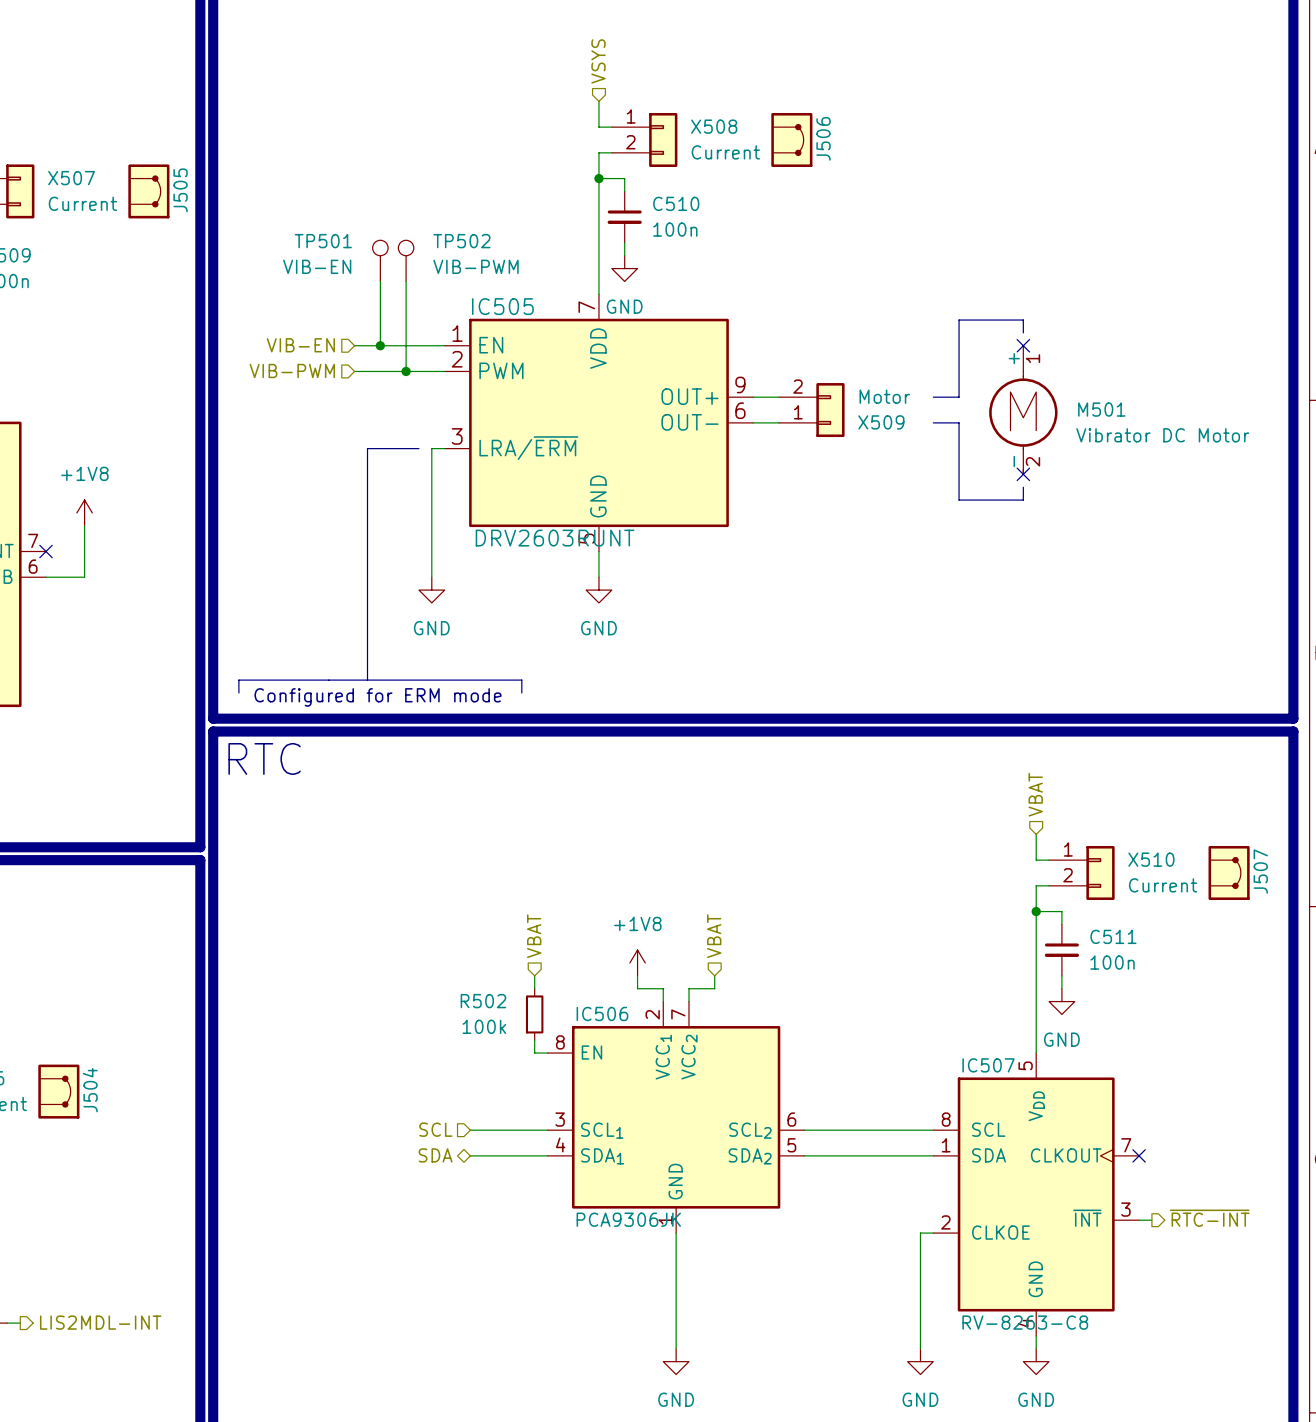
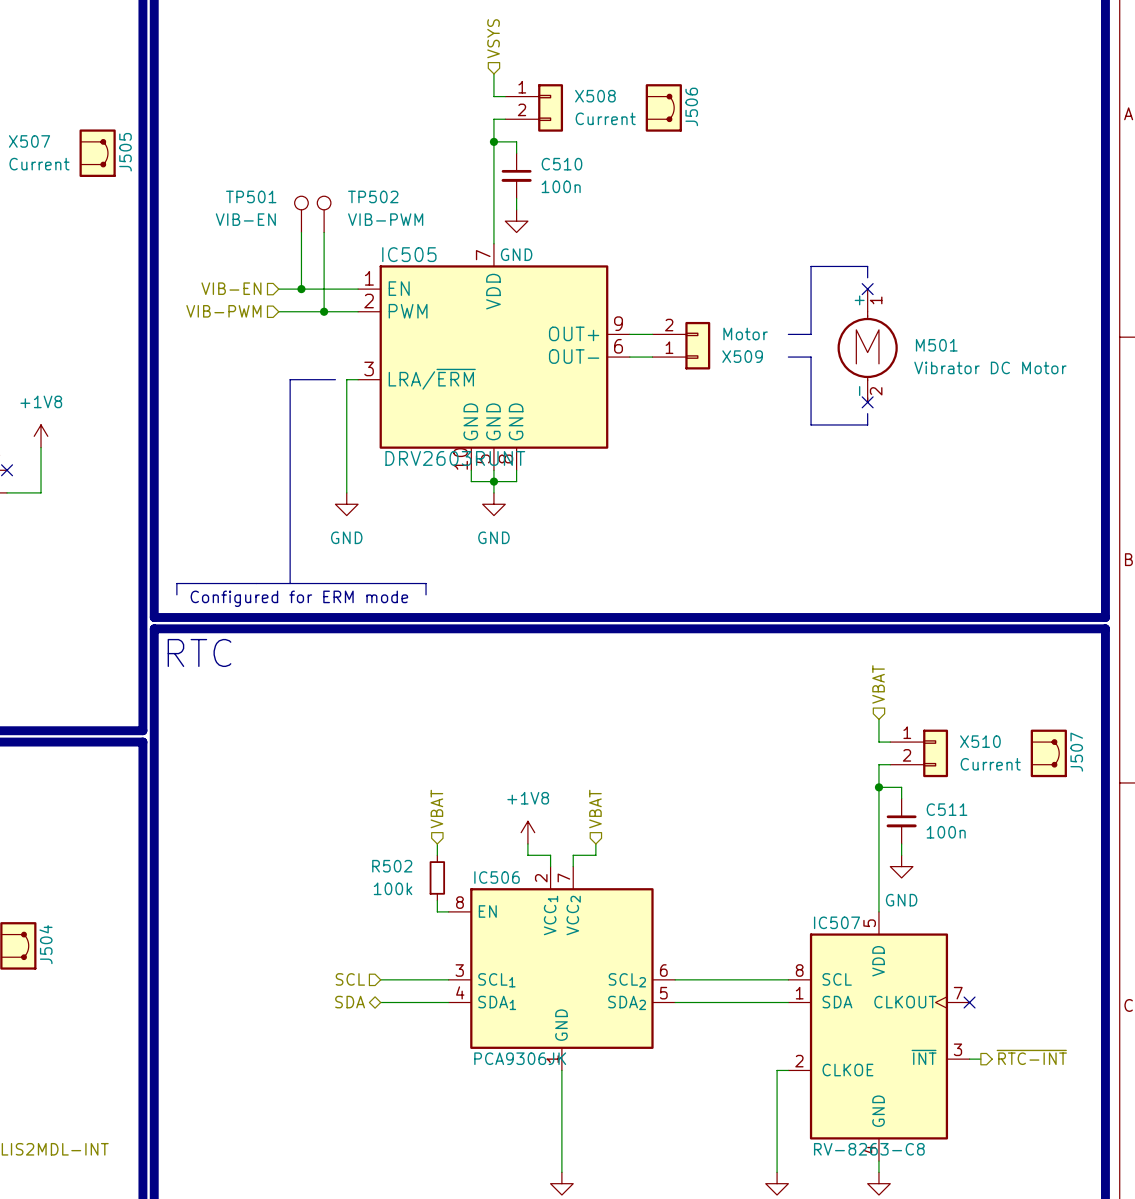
IC505 symbol: [444, 294, 754, 552] -> [358, 243, 630, 471]
wire: none -> (471, 470) (471, 481) (516, 481) (516, 470)
junction: none -> (493, 481)
IC507 symbol: [933, 1053, 1140, 1336] -> [788, 911, 970, 1162]

